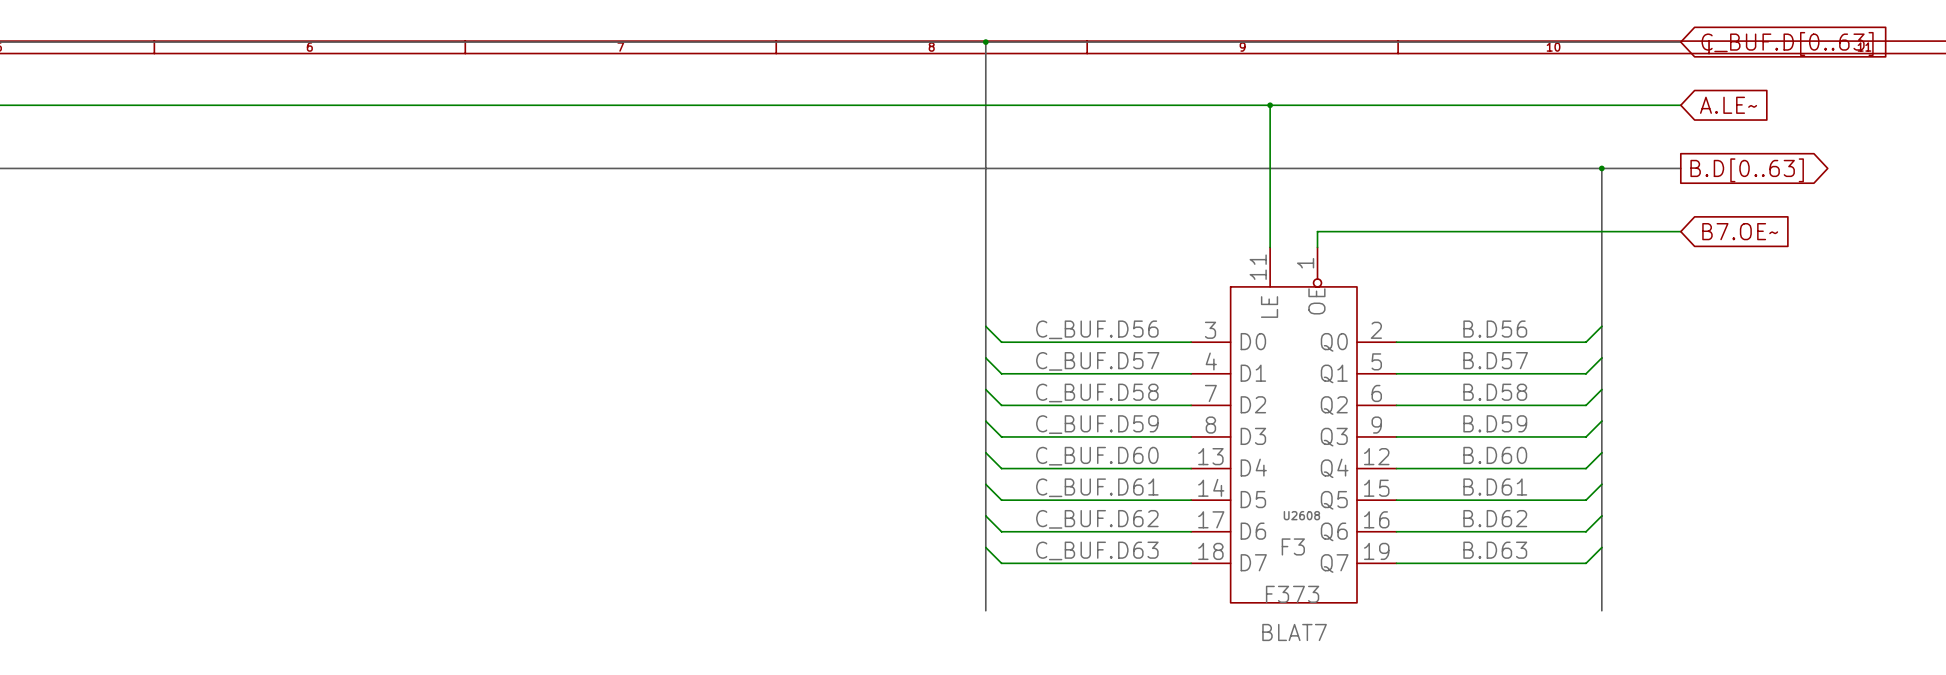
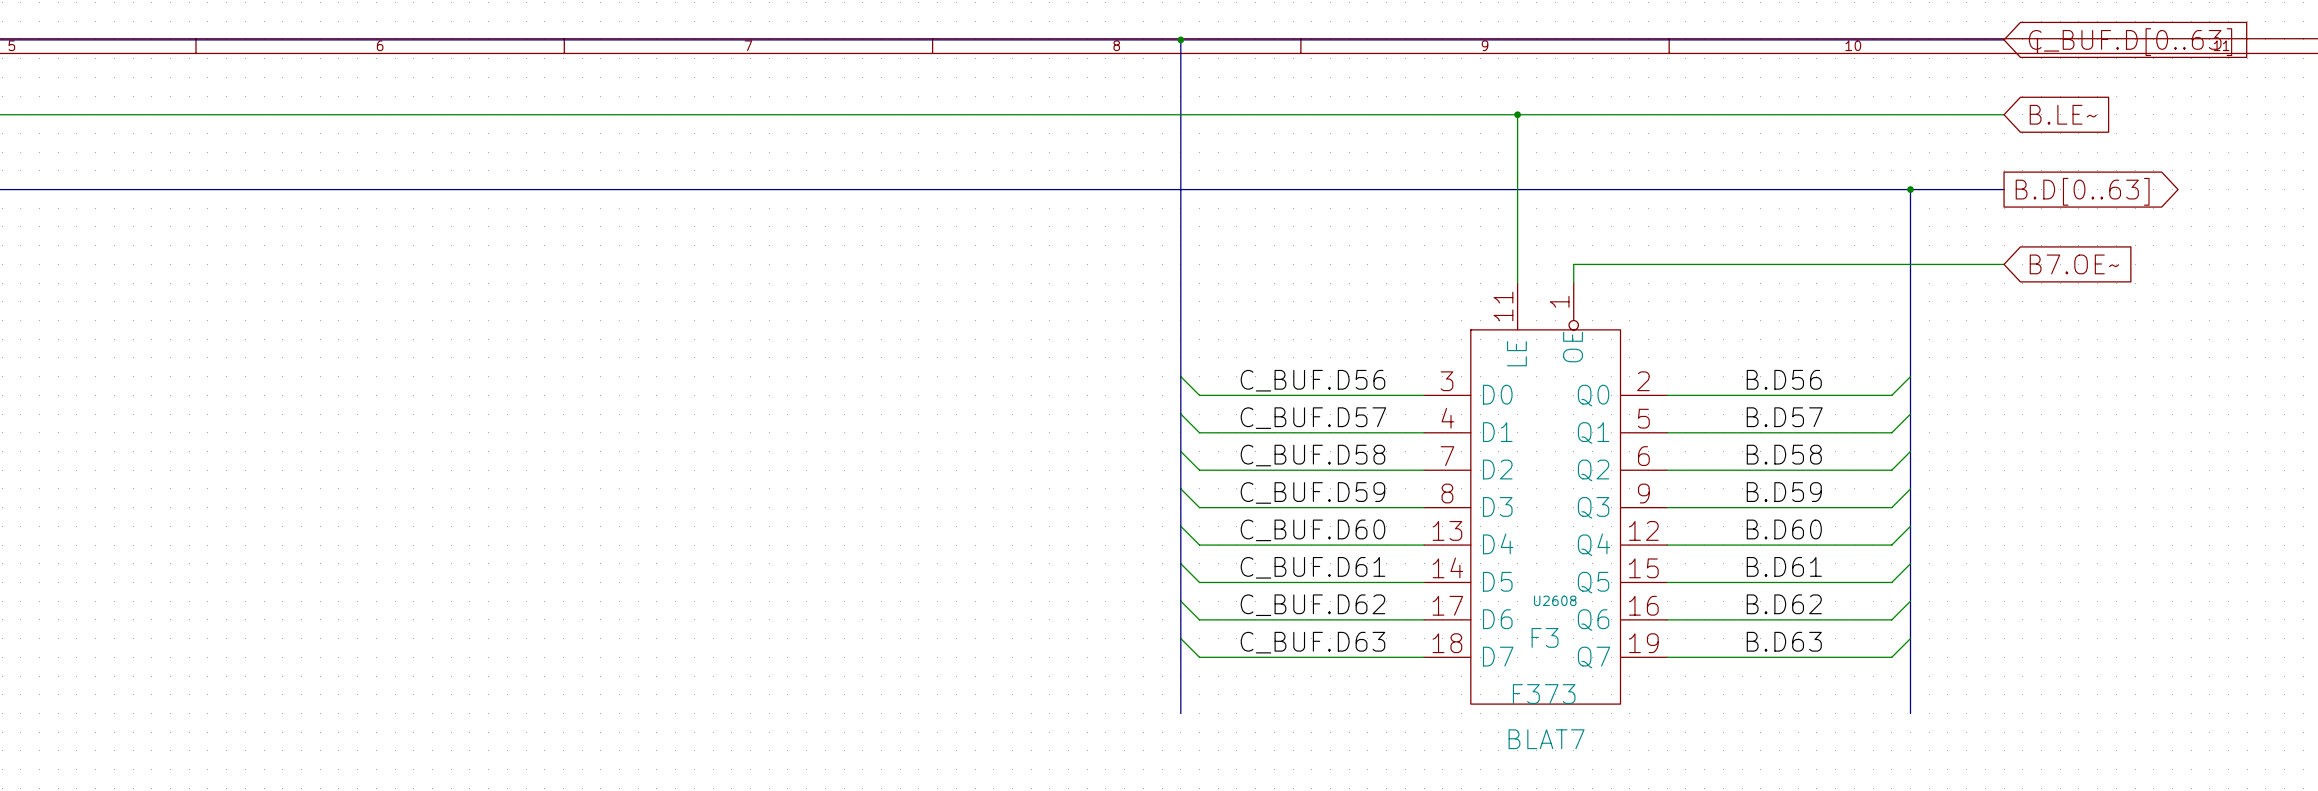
global label: A.LE~ (1728, 105) -> B.LE~ (2063, 114)

